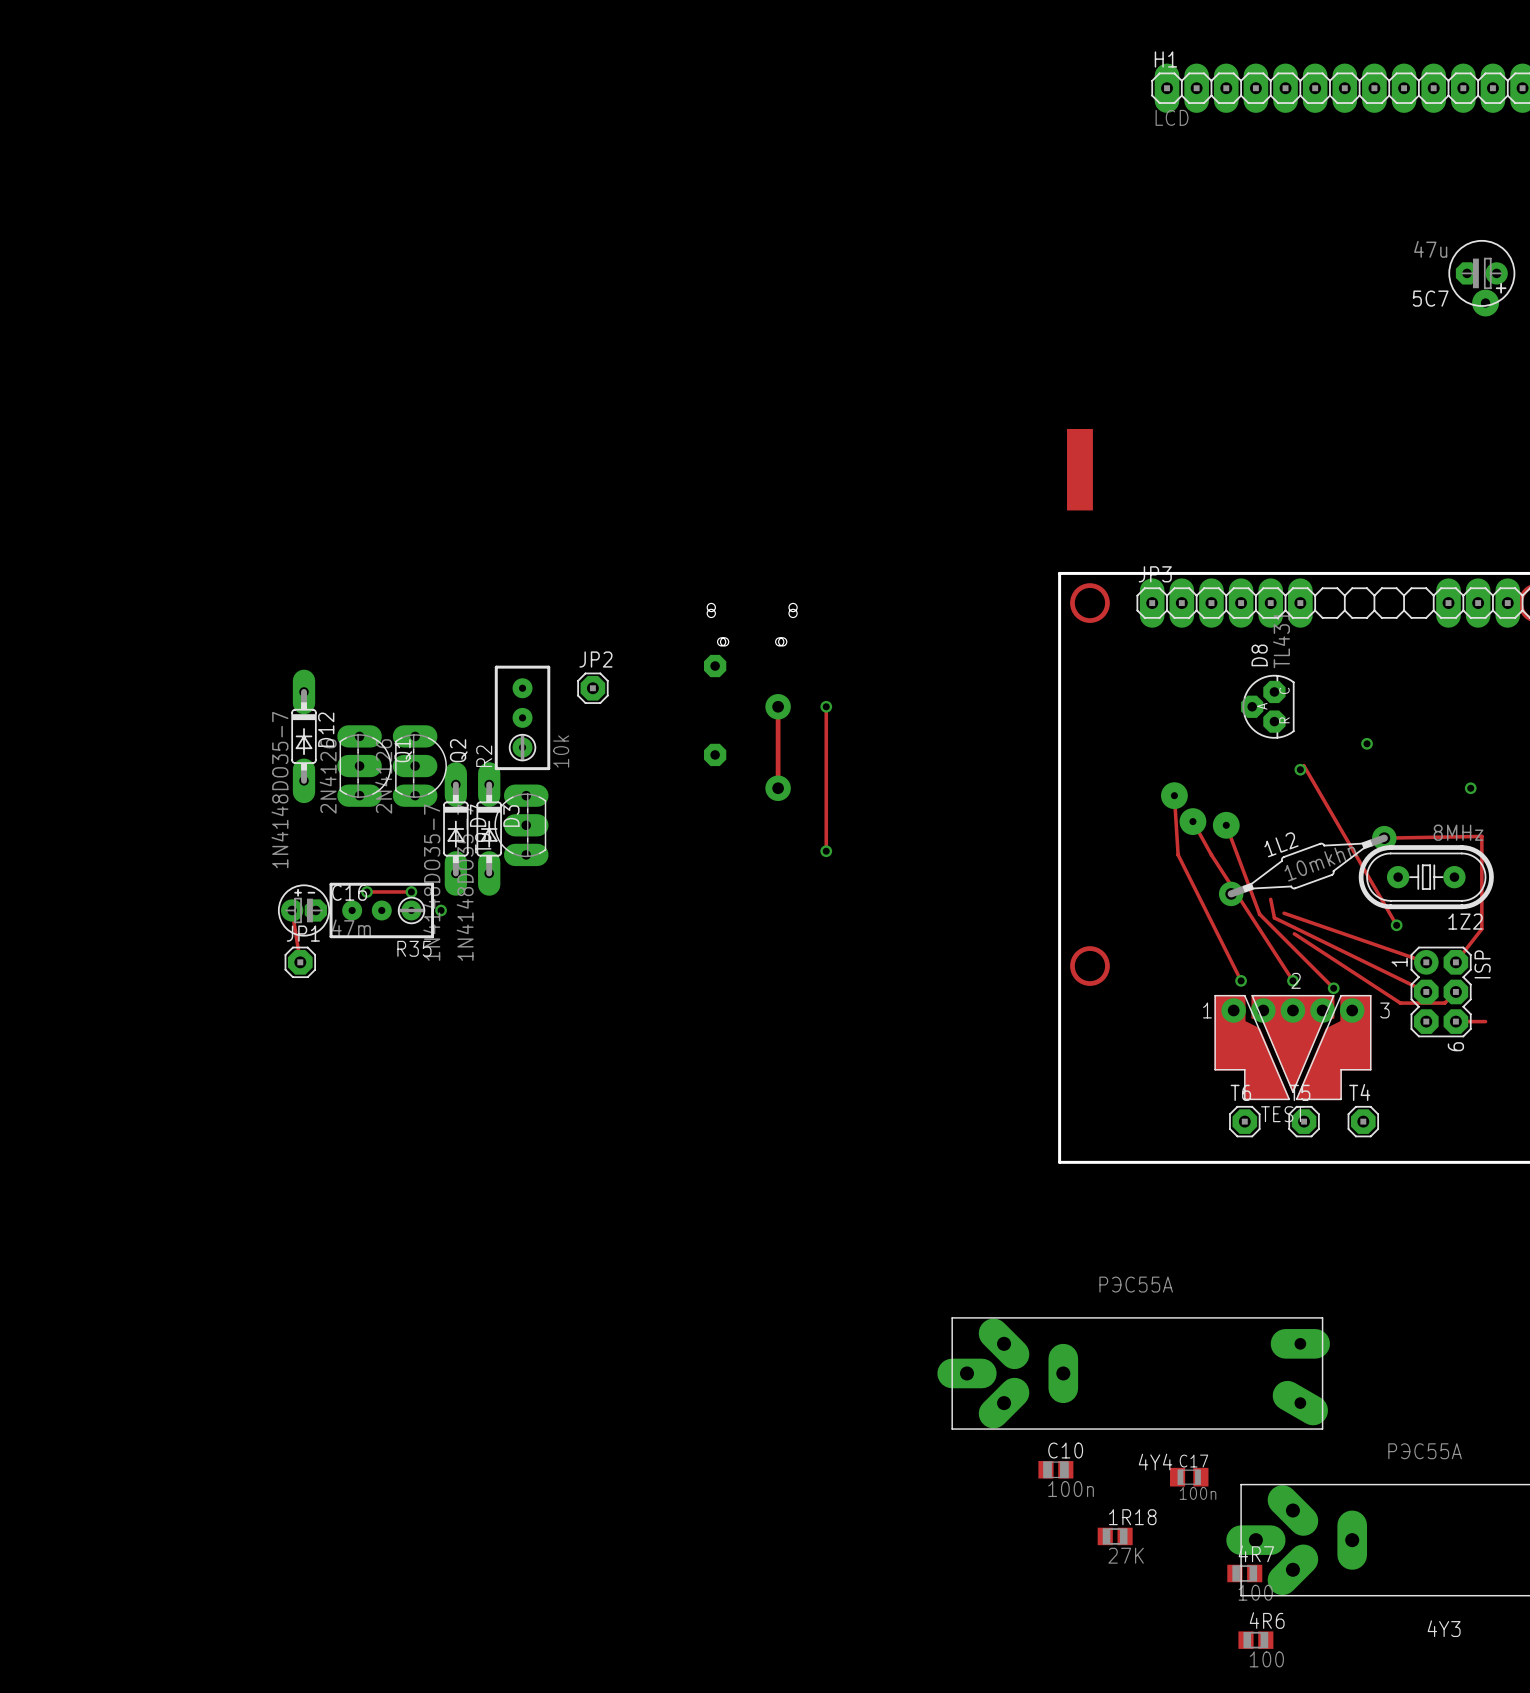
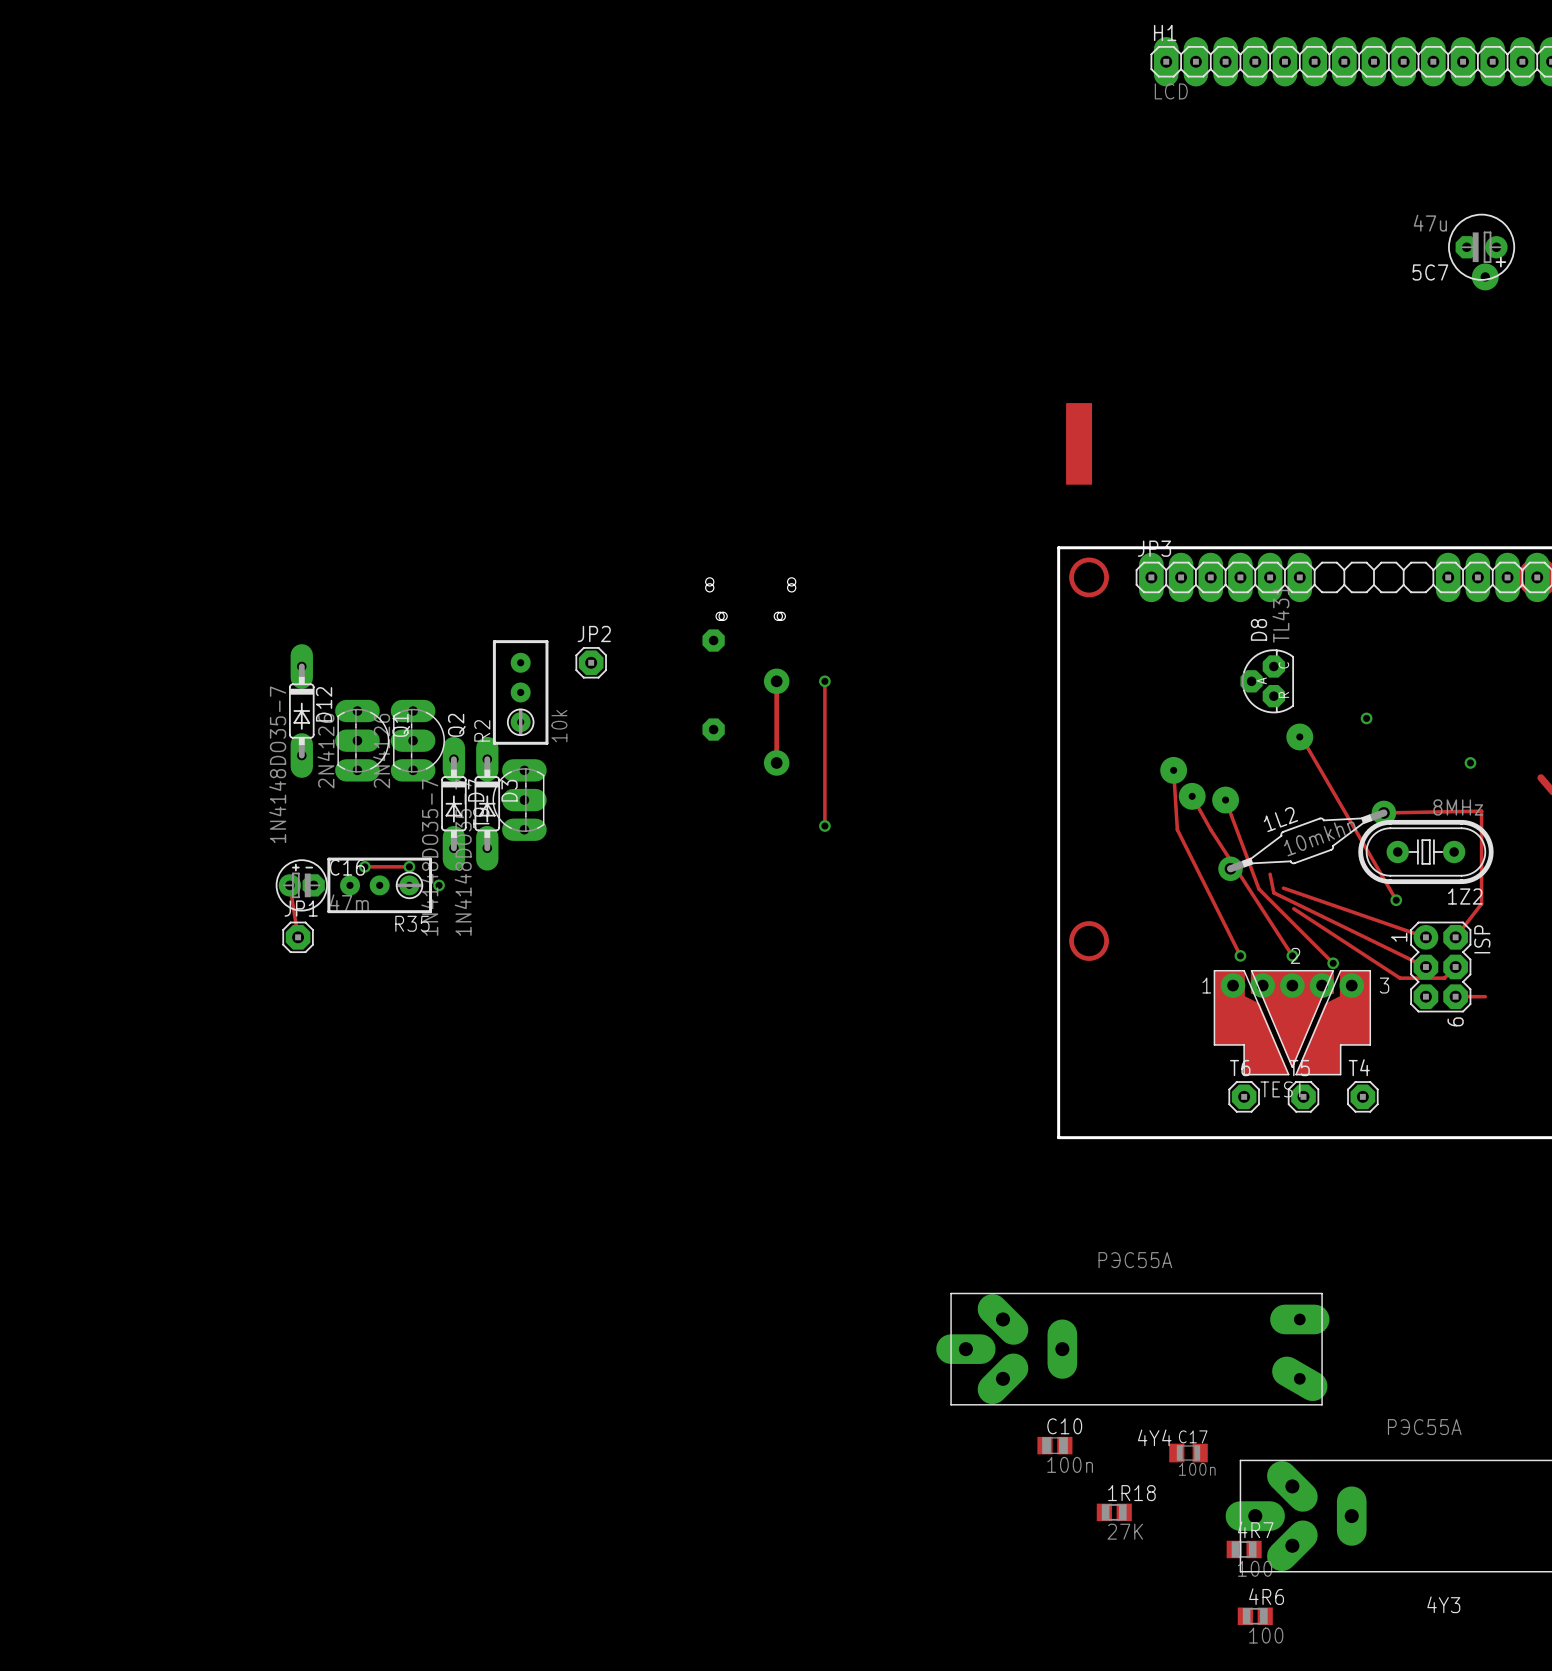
via size: [1294, 763, 1307, 776] -> [1286, 723, 1314, 751]

